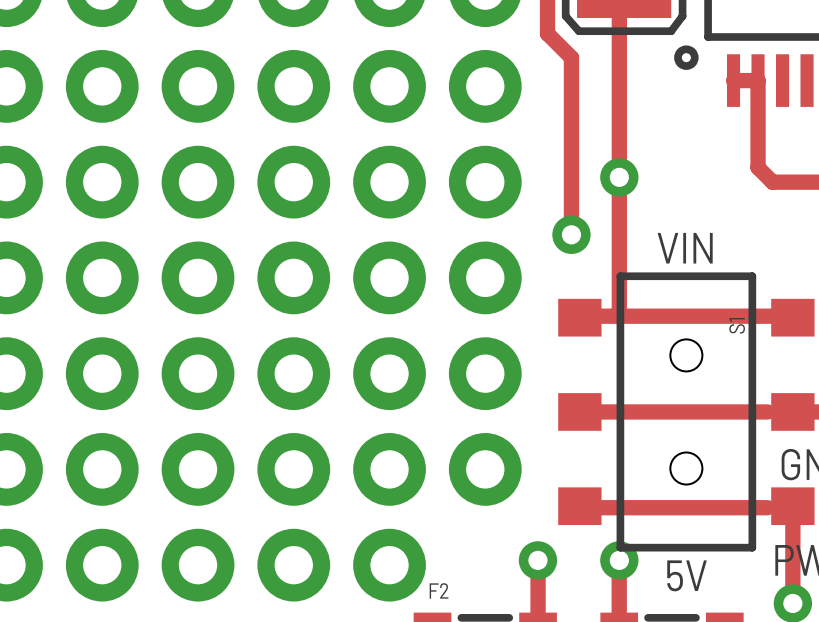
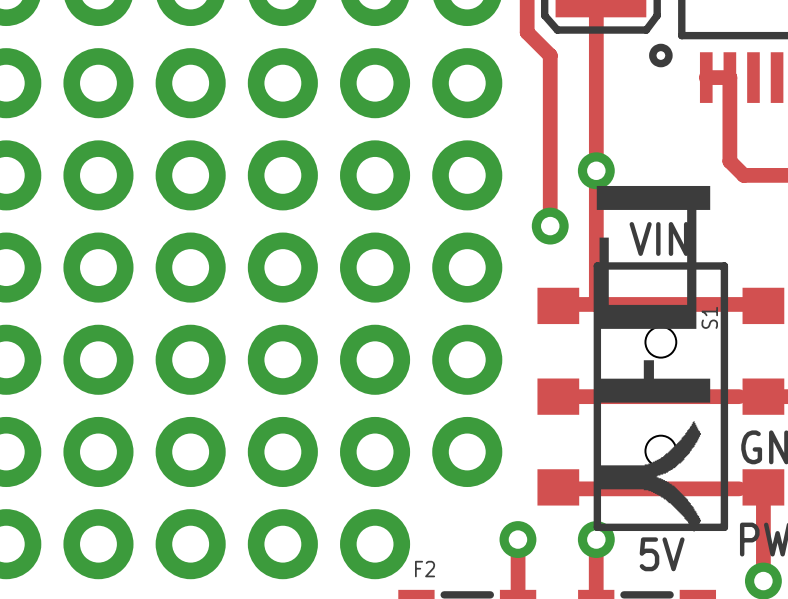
drawing: none -> [596, 185, 711, 532]

